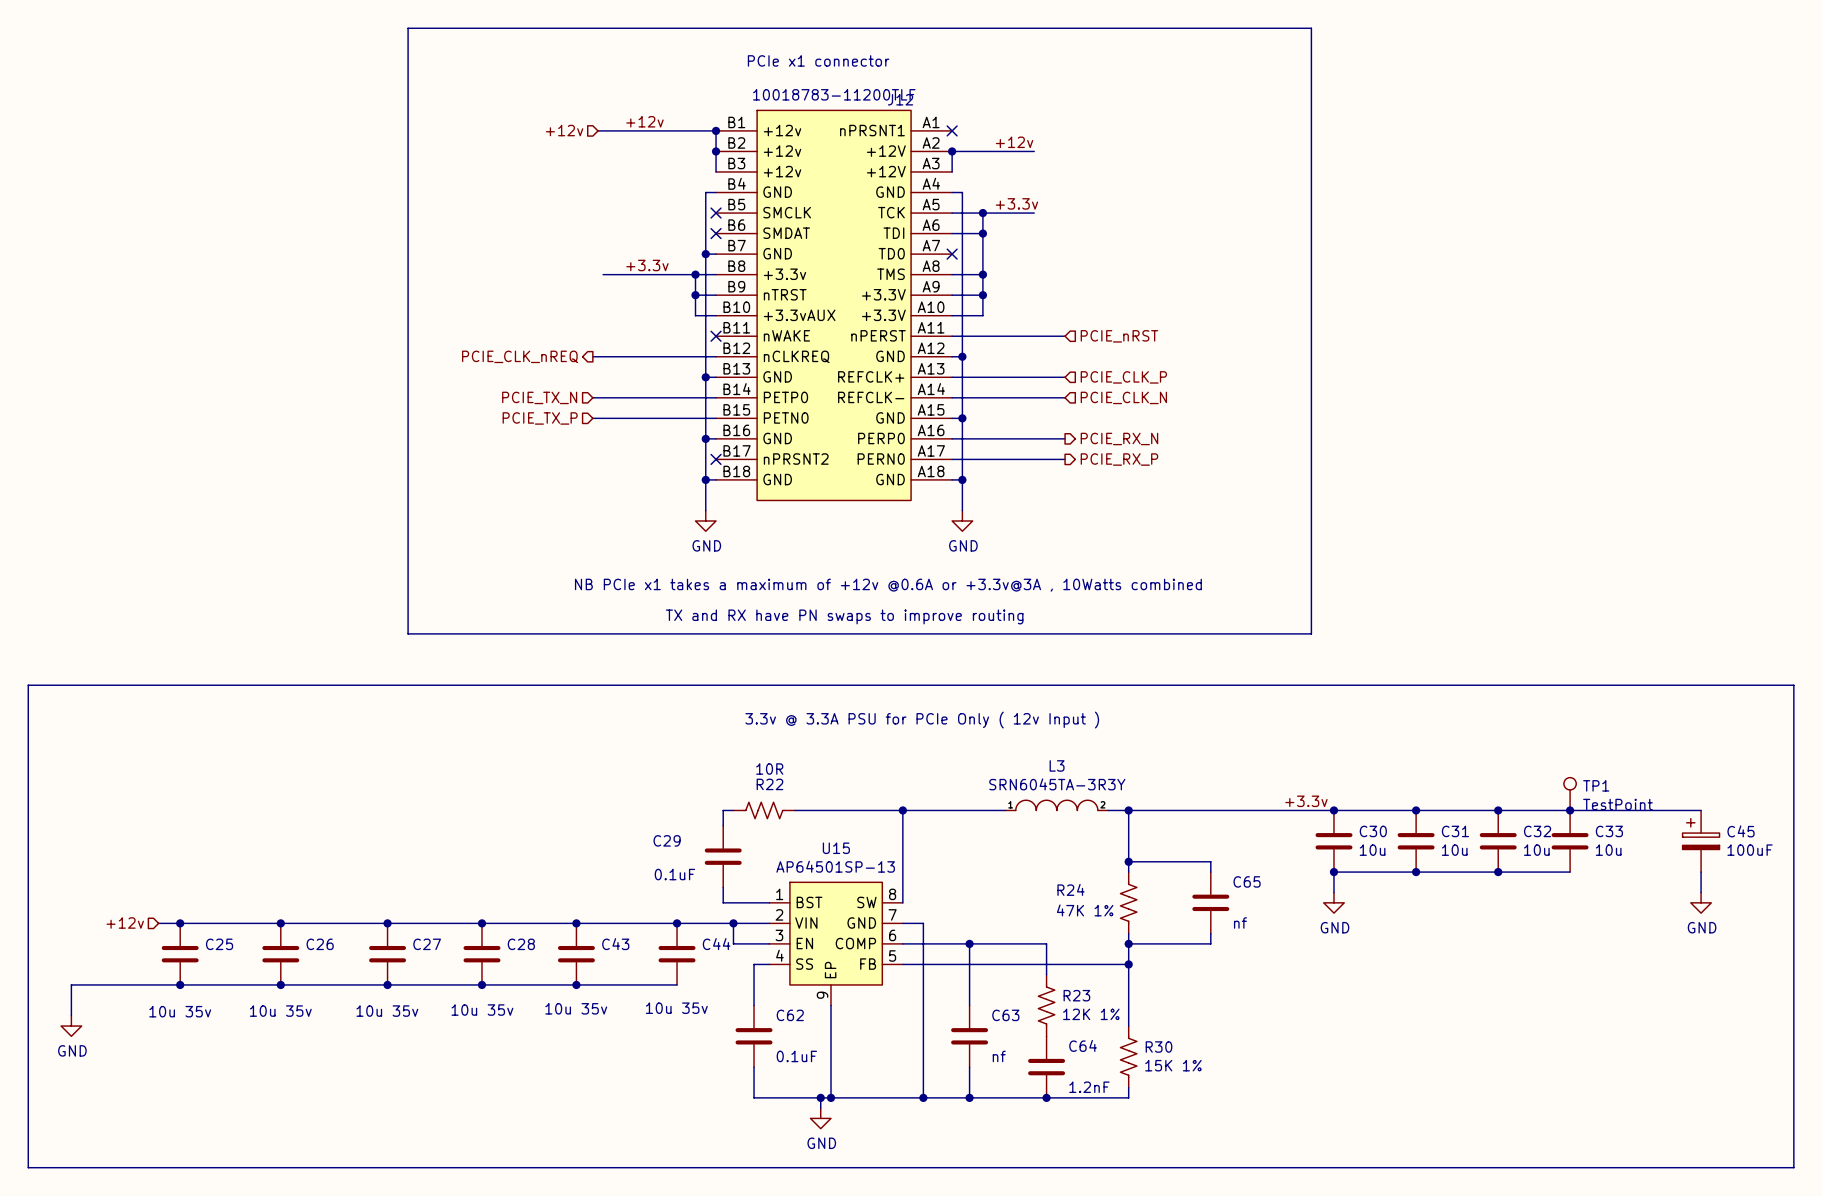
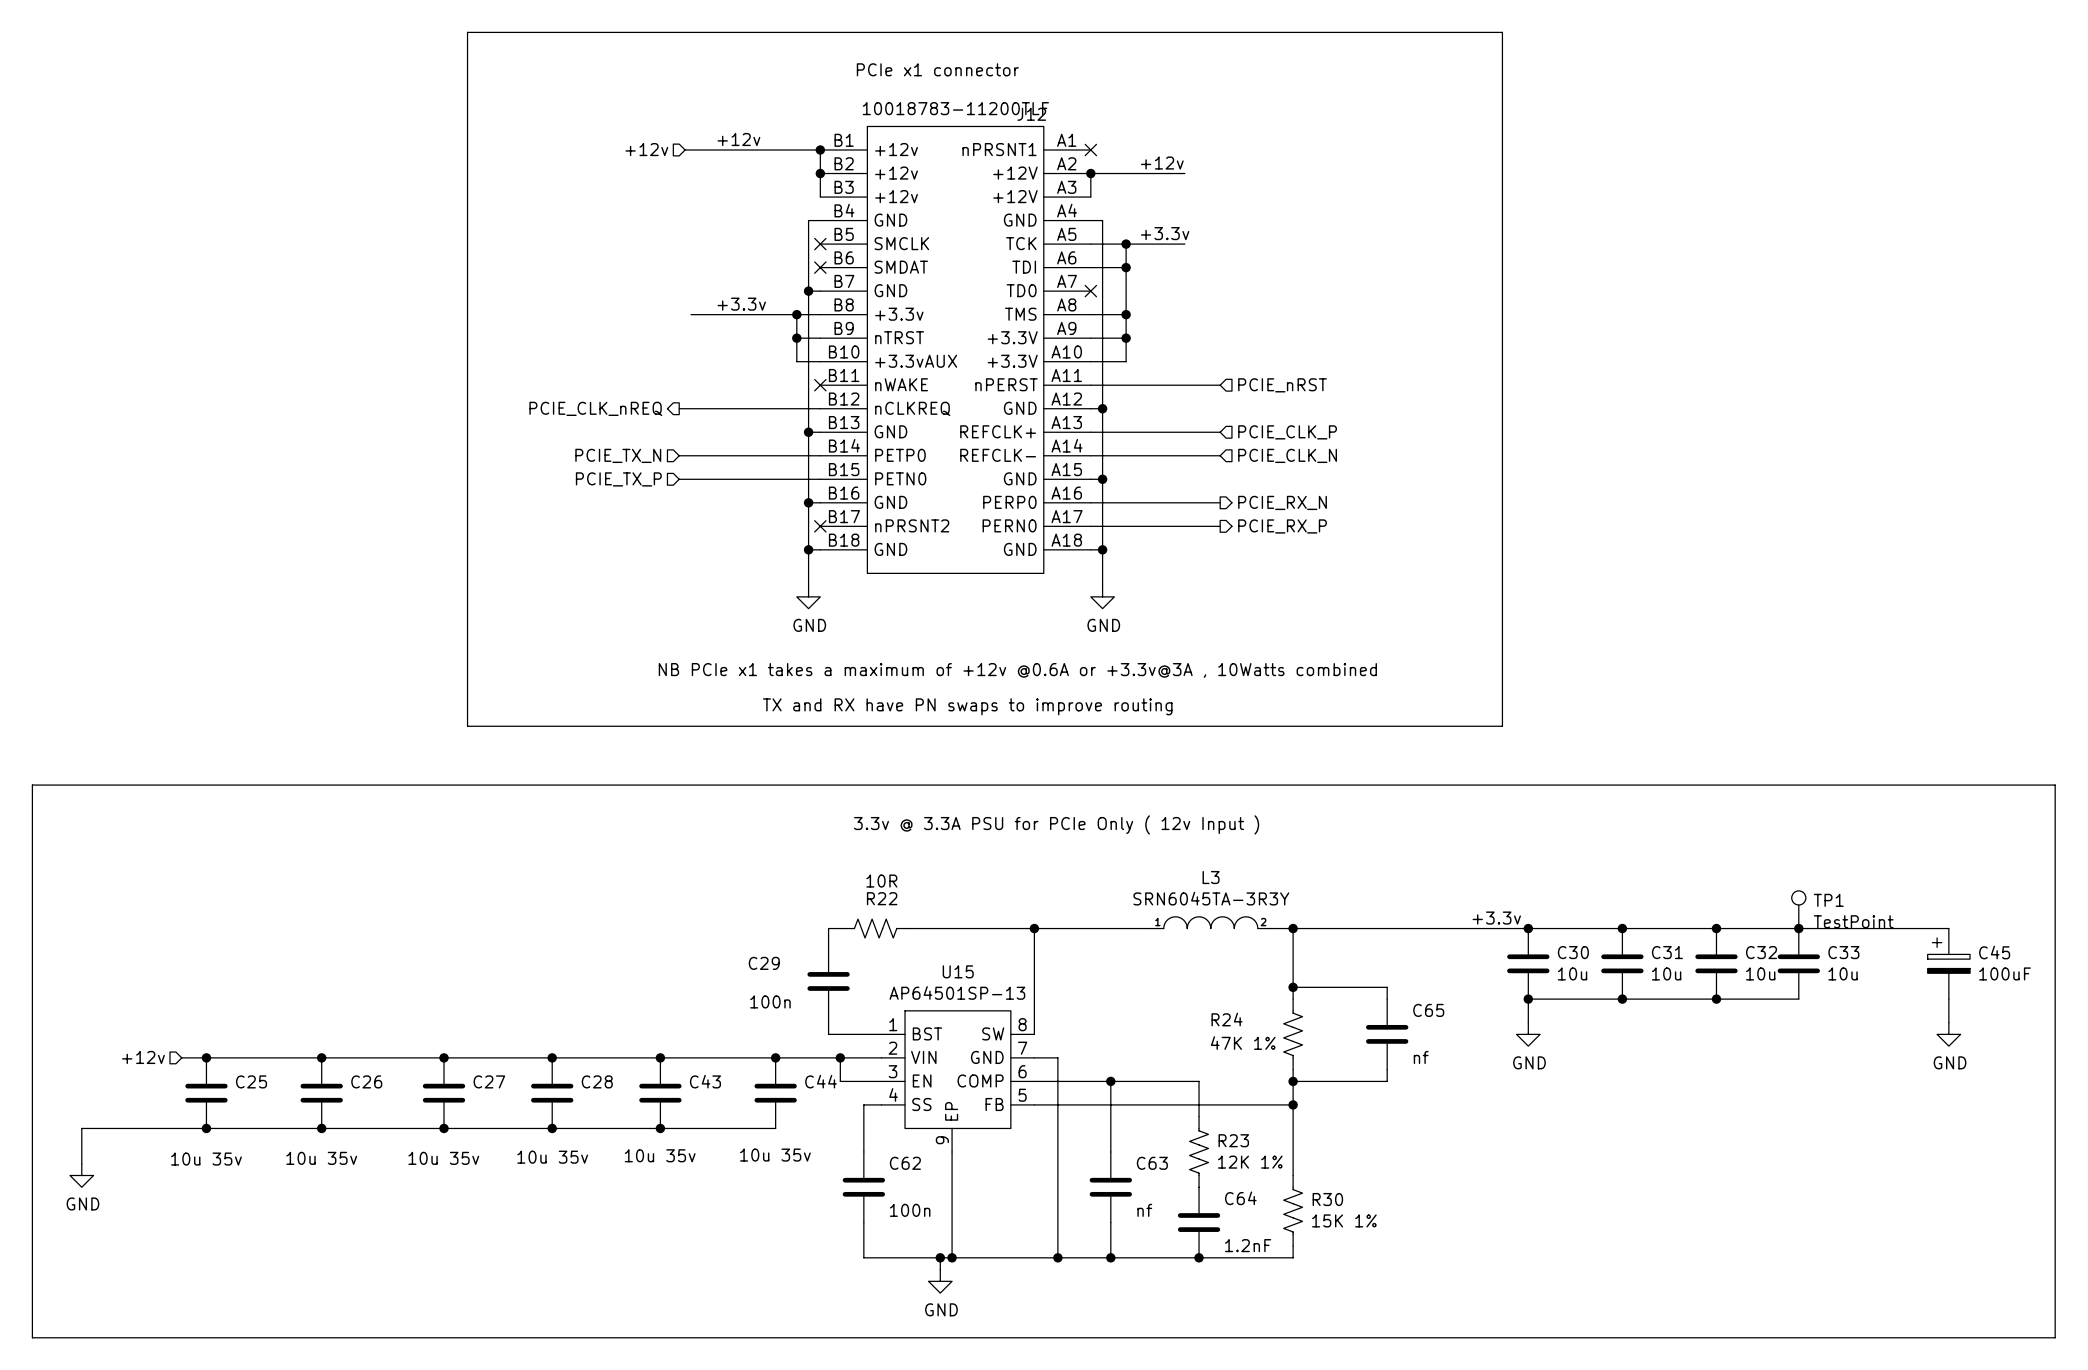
C29 value: 0.1uF (674, 874) -> 100n (770, 1001)
C62 value: 0.1uF (796, 1056) -> 100n (910, 1210)

